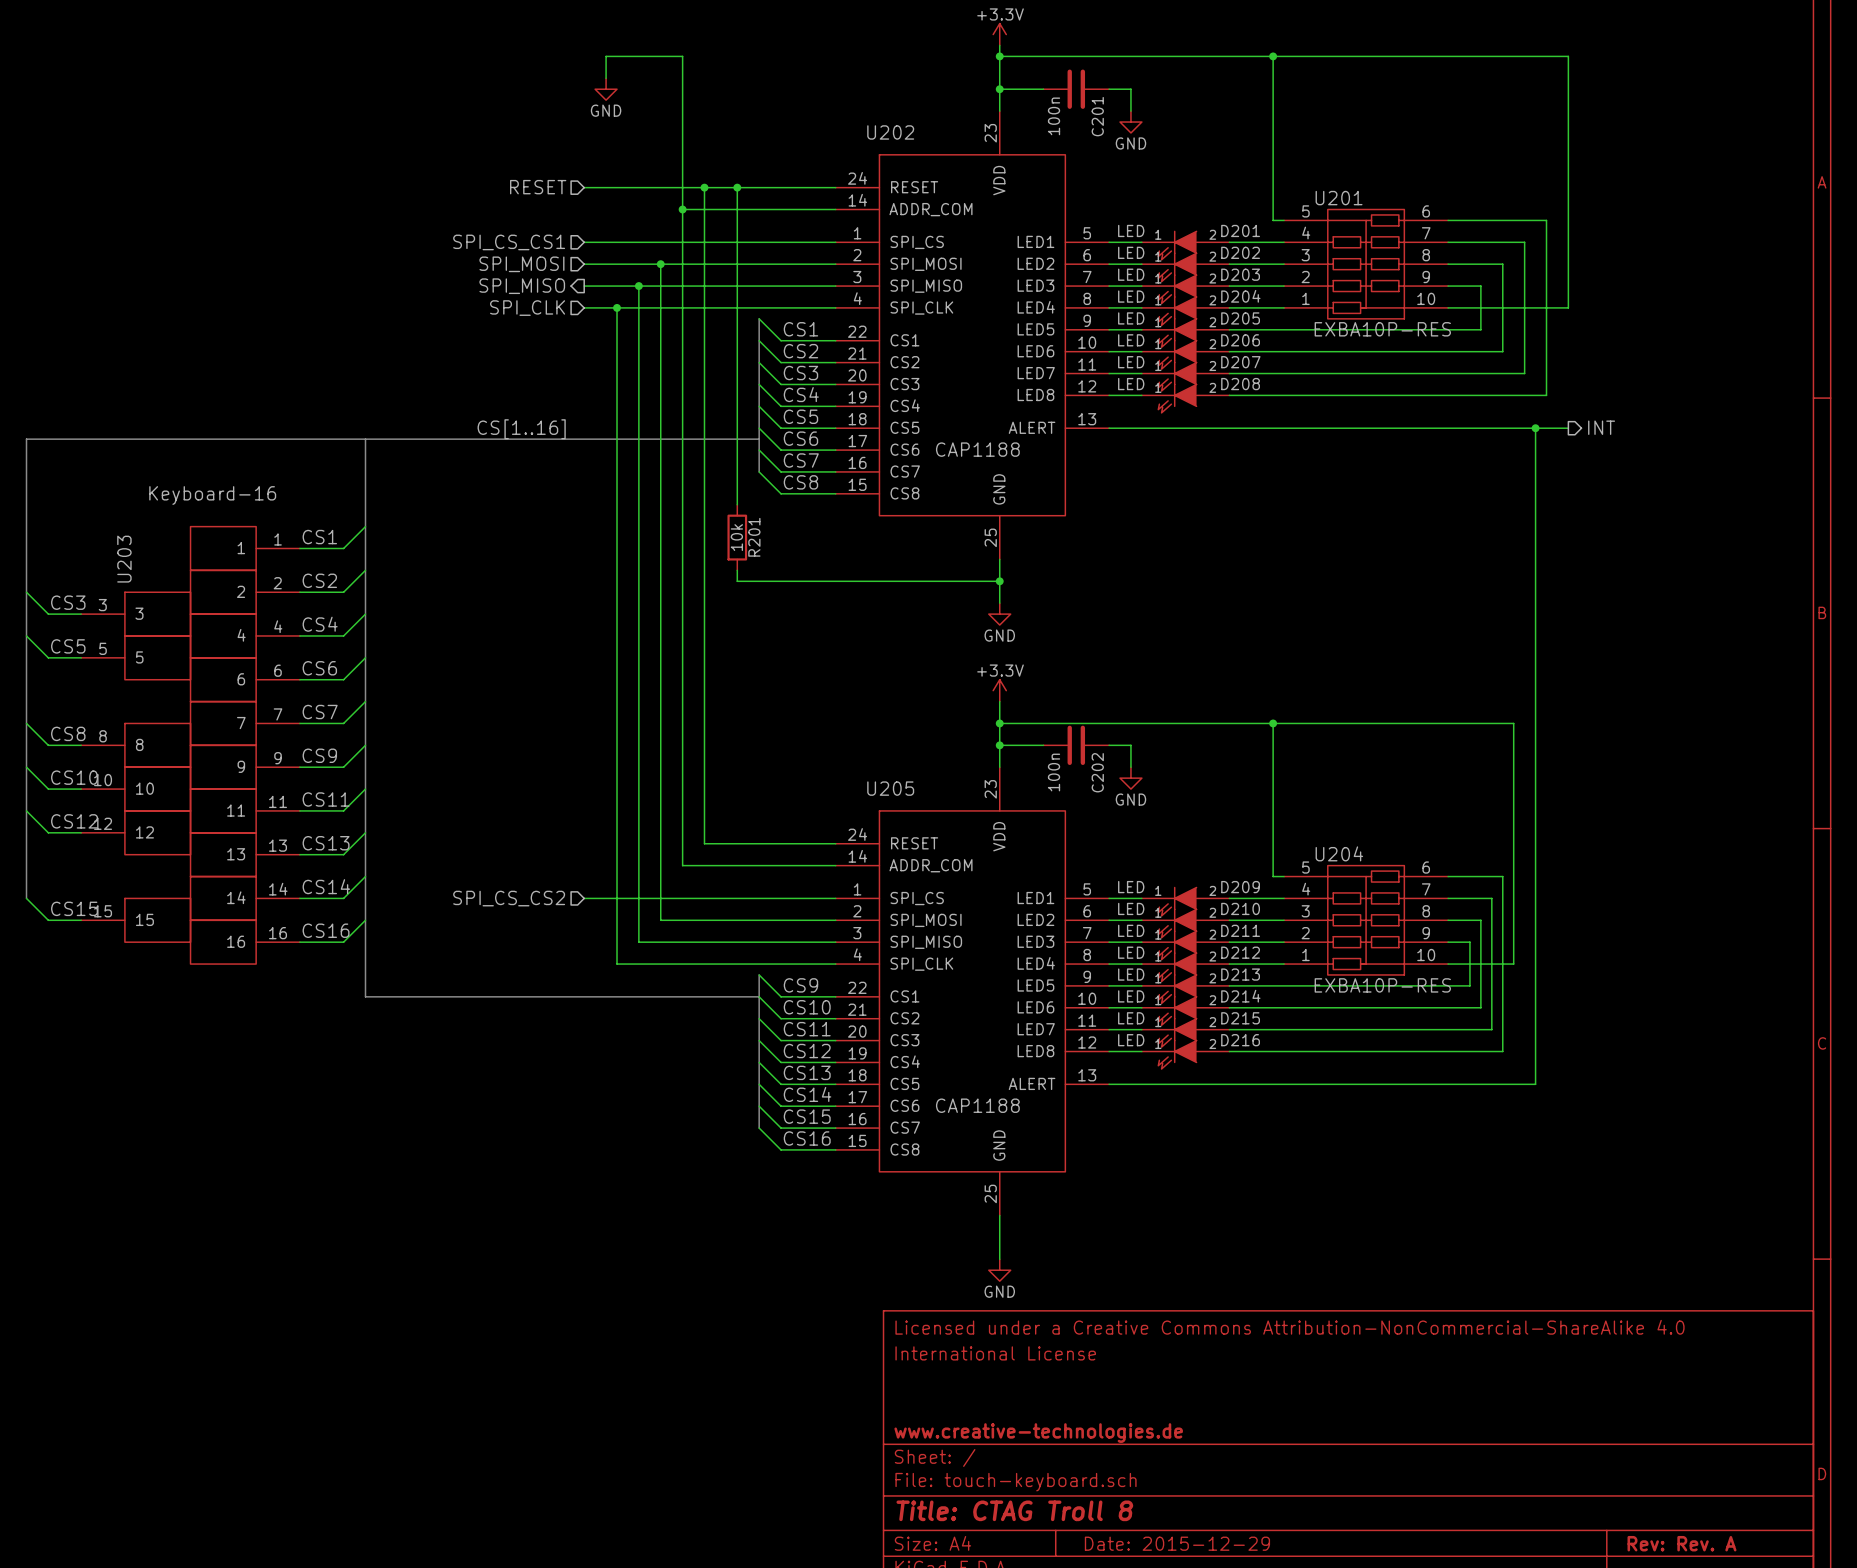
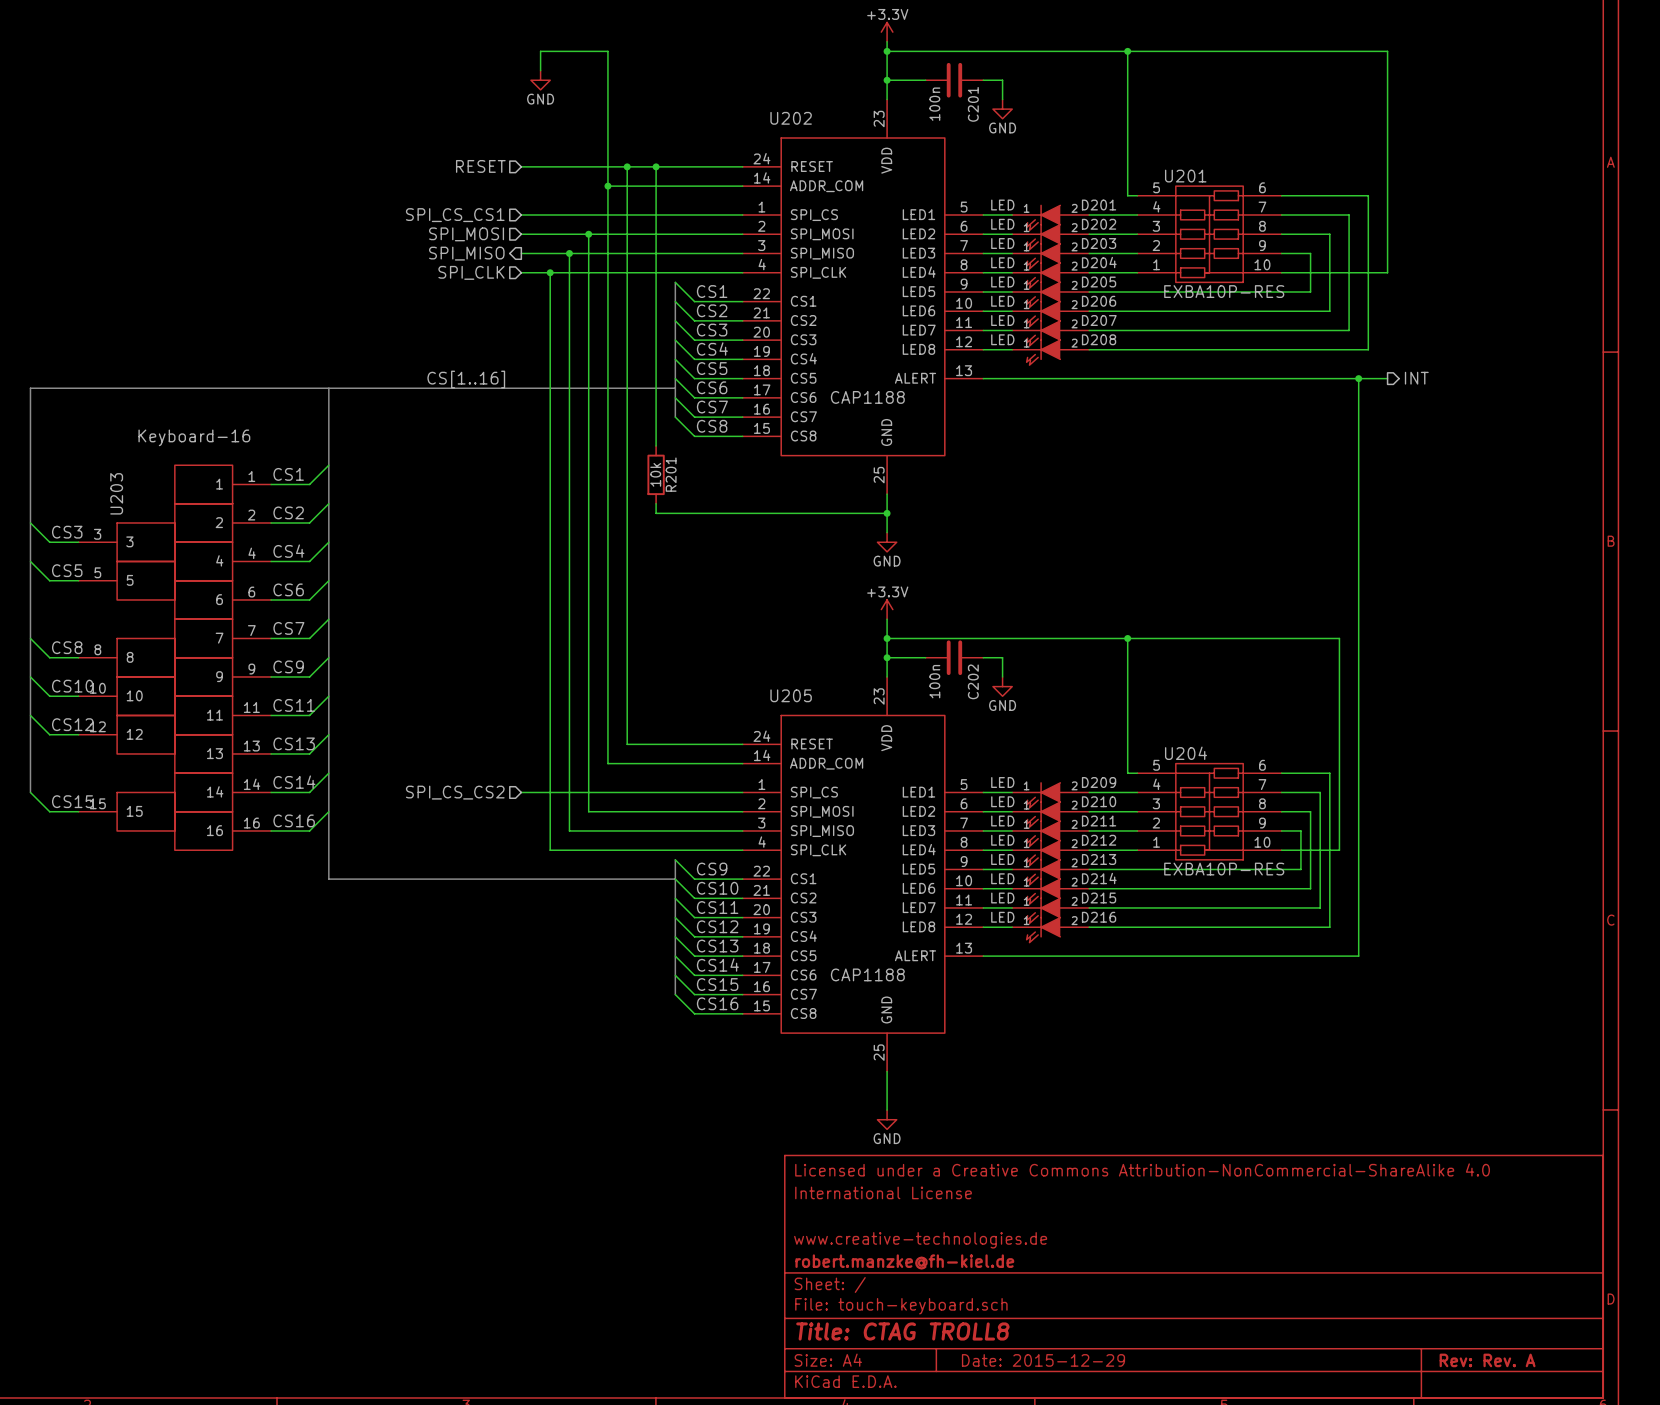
title block: none -> www.creative-technologies.de (920, 1240)
title block: www.creative-technologies.de (1038, 1433) -> robert.manzke@fh-kiel.de (904, 1261)
title block: Title: CTAG Troll 8 (1014, 1510) -> Title: CTAG TROLL8 (902, 1331)

